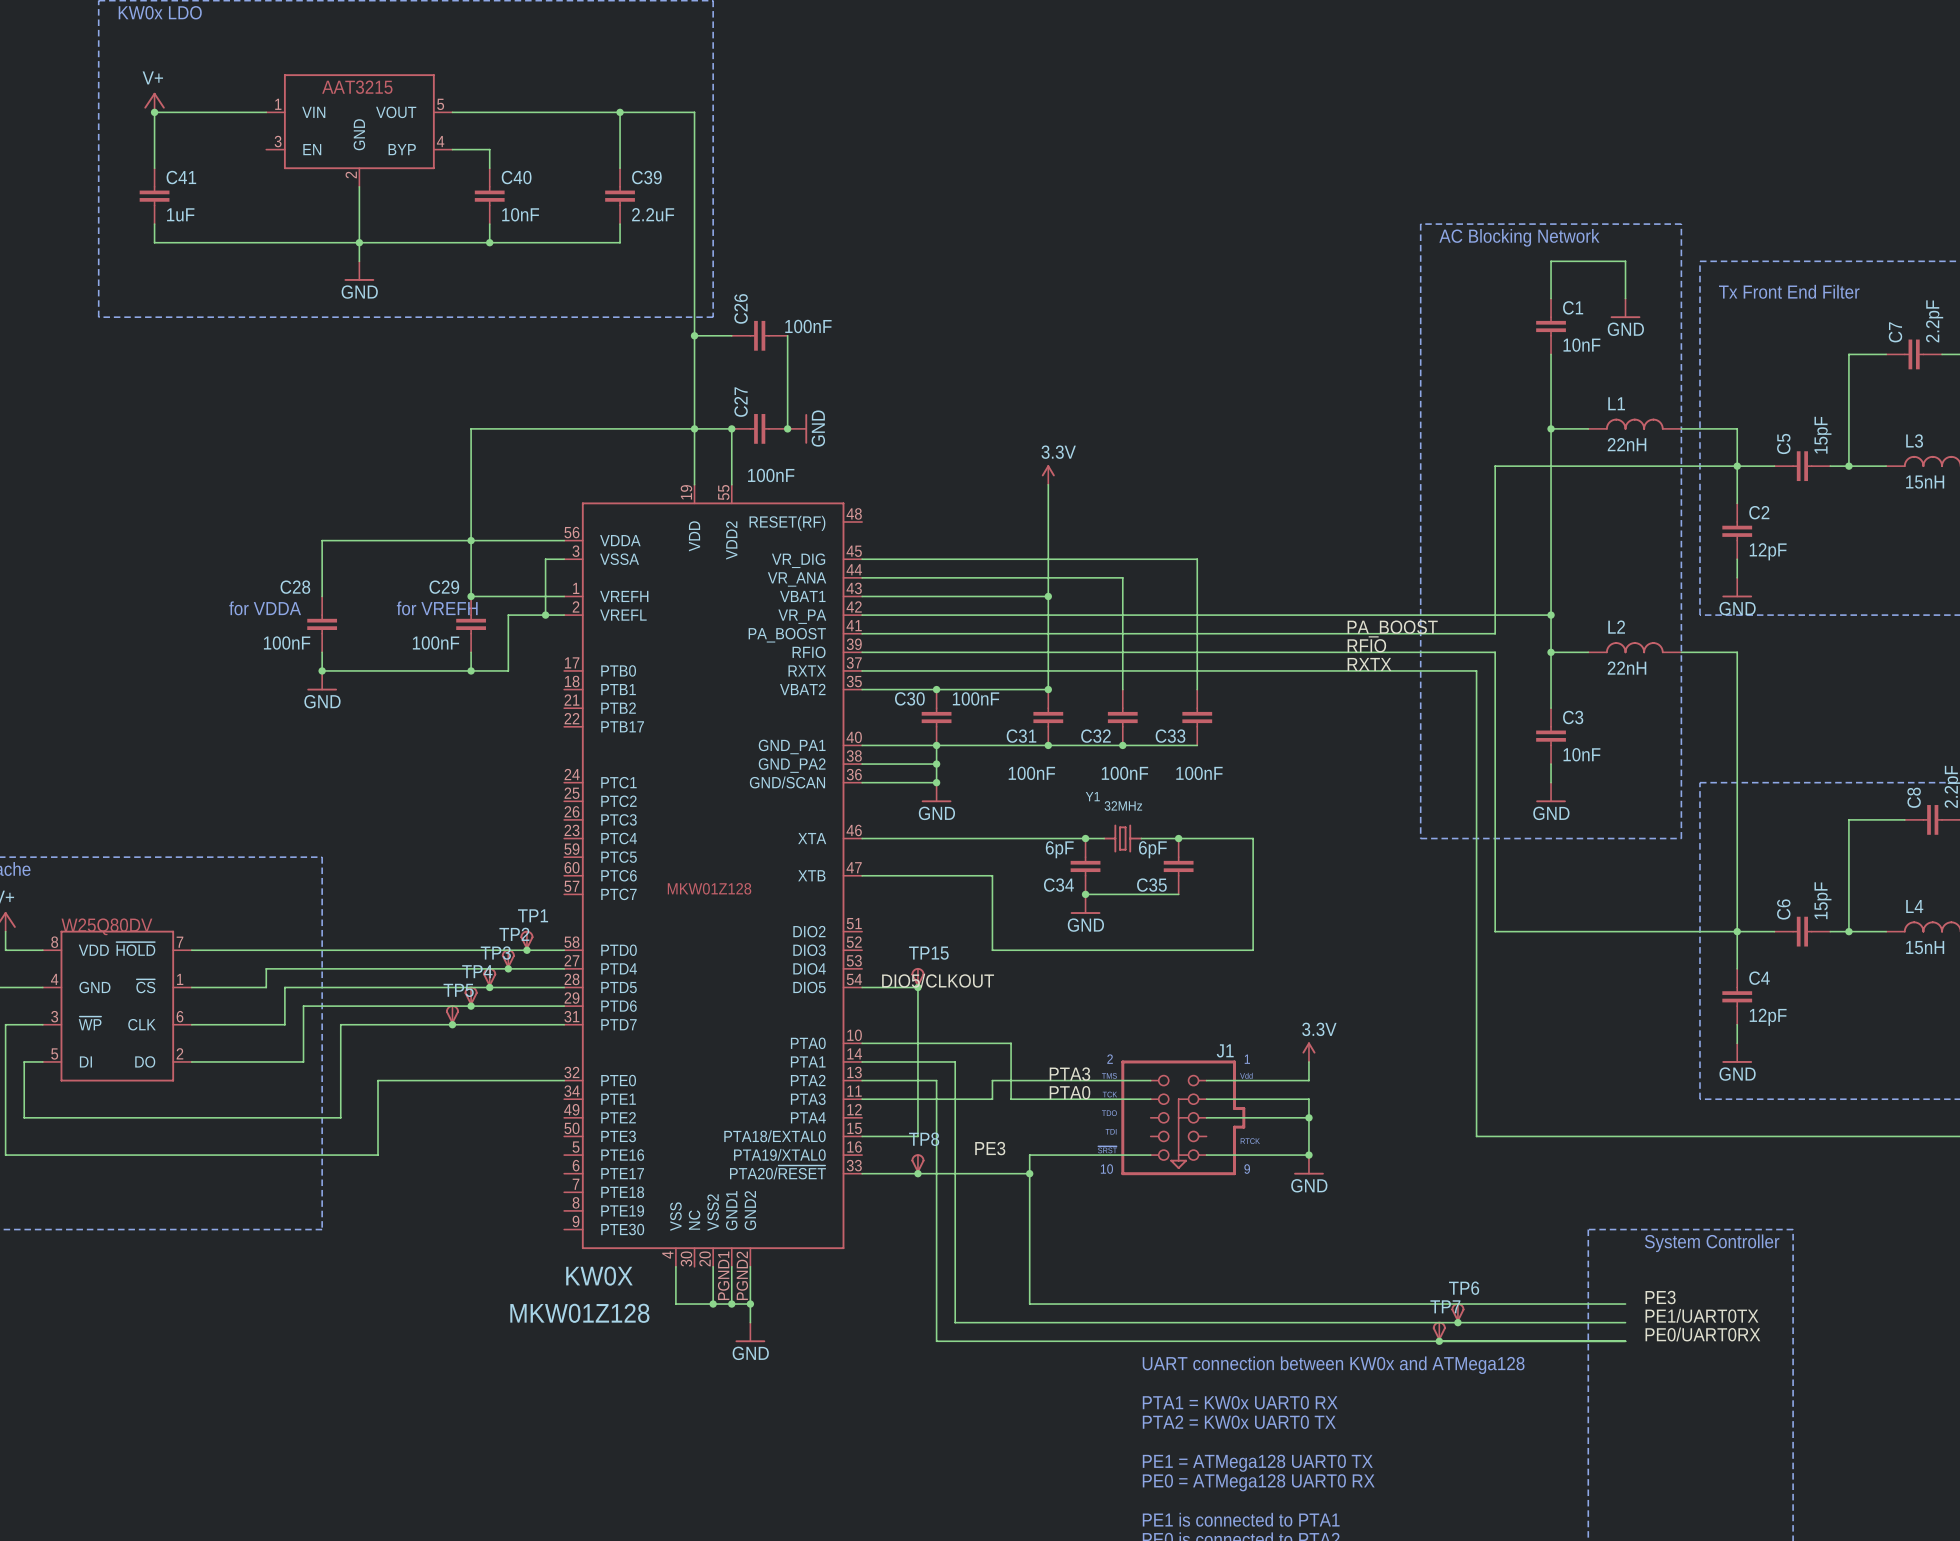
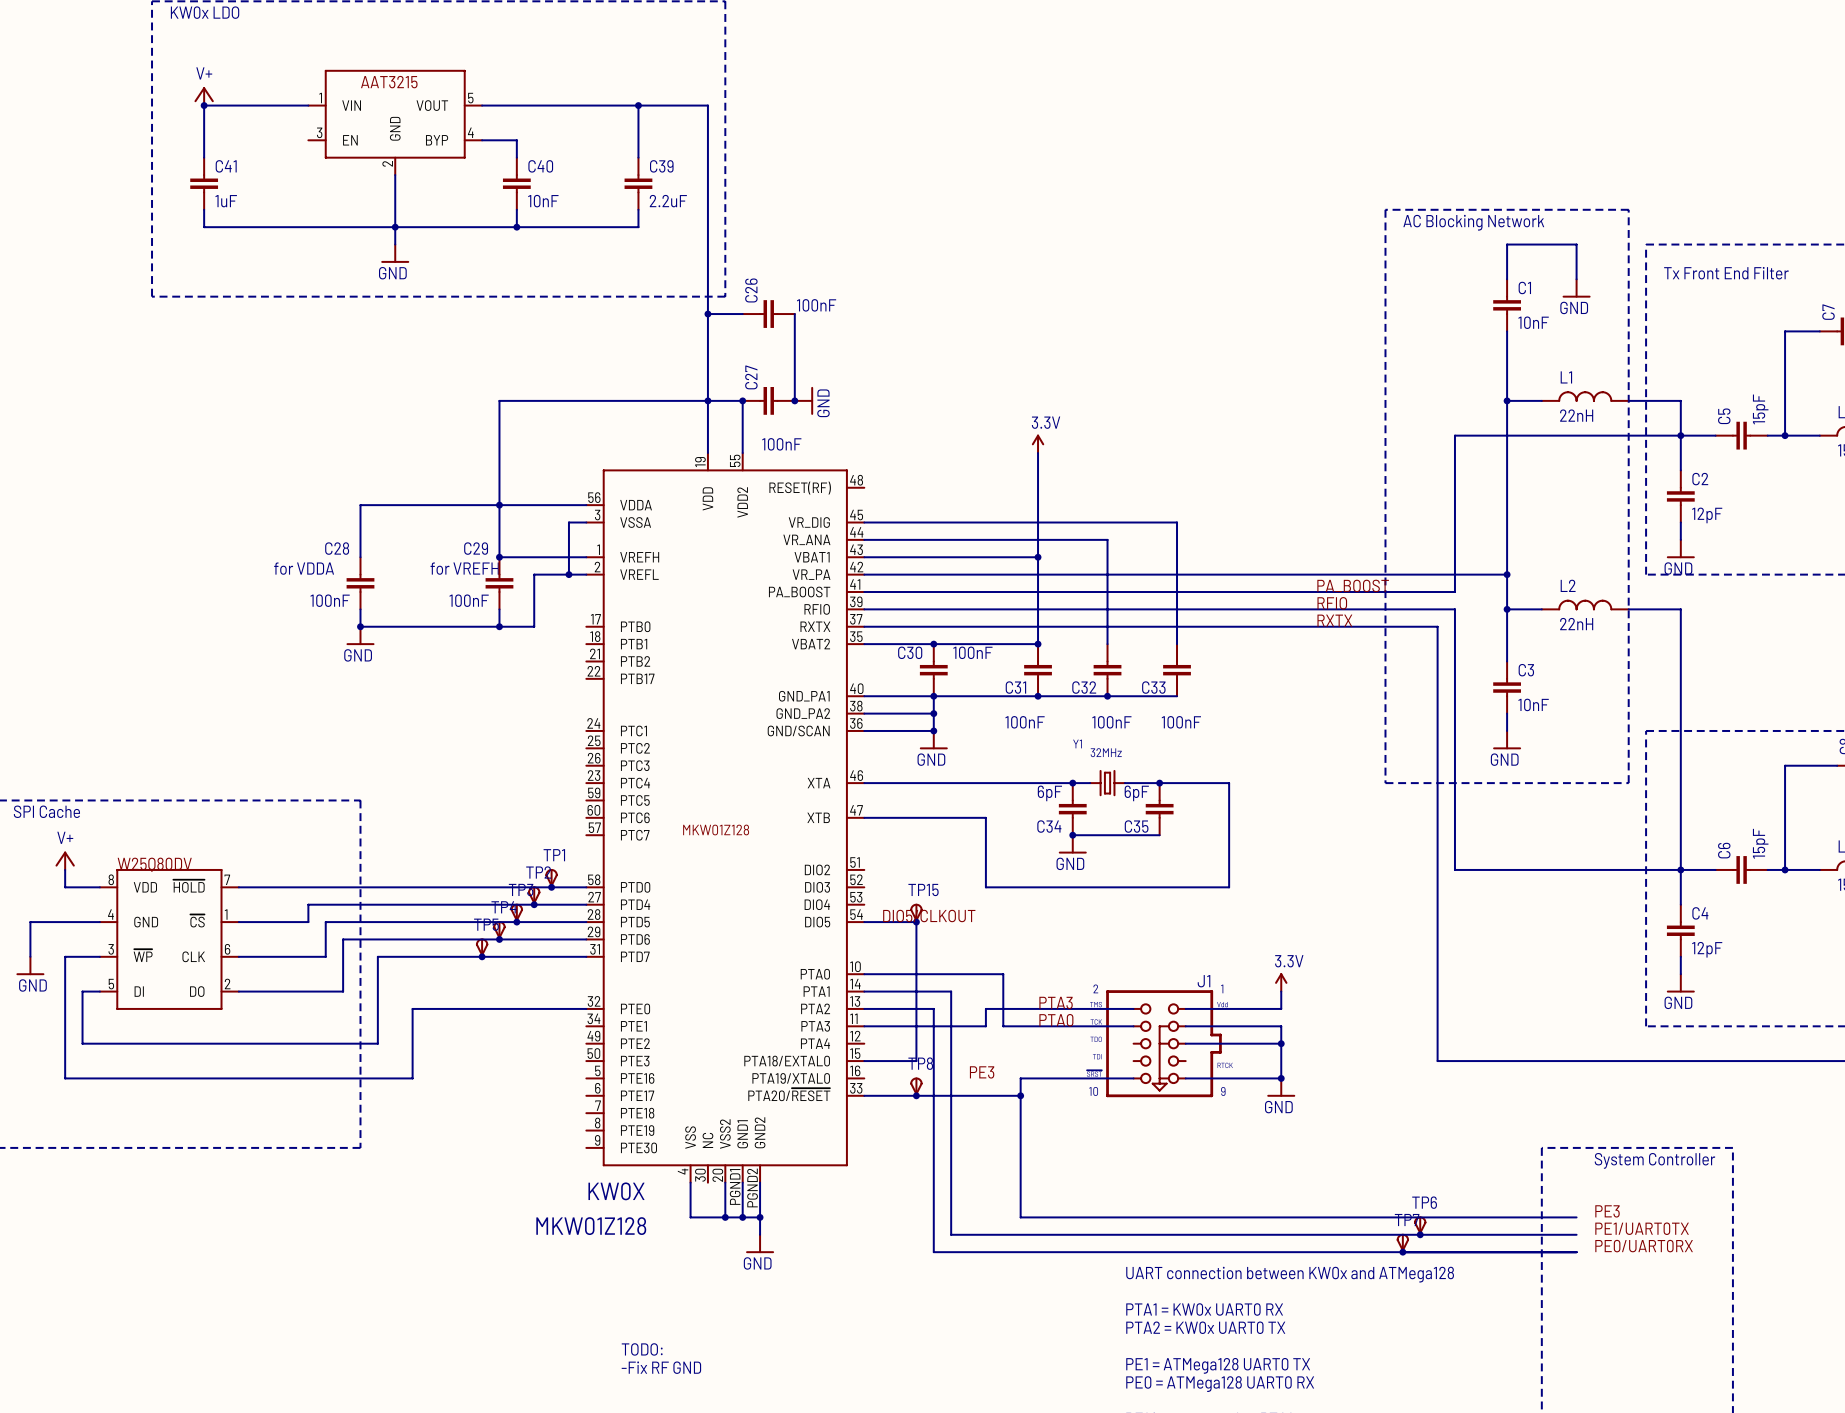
text: none -> TODO: (642, 1349)
text: none -> -Fix RF GND (661, 1367)

